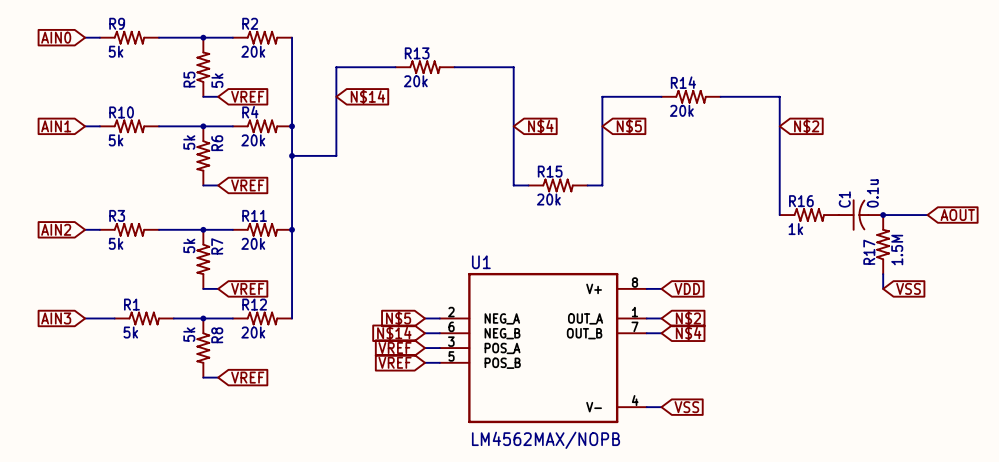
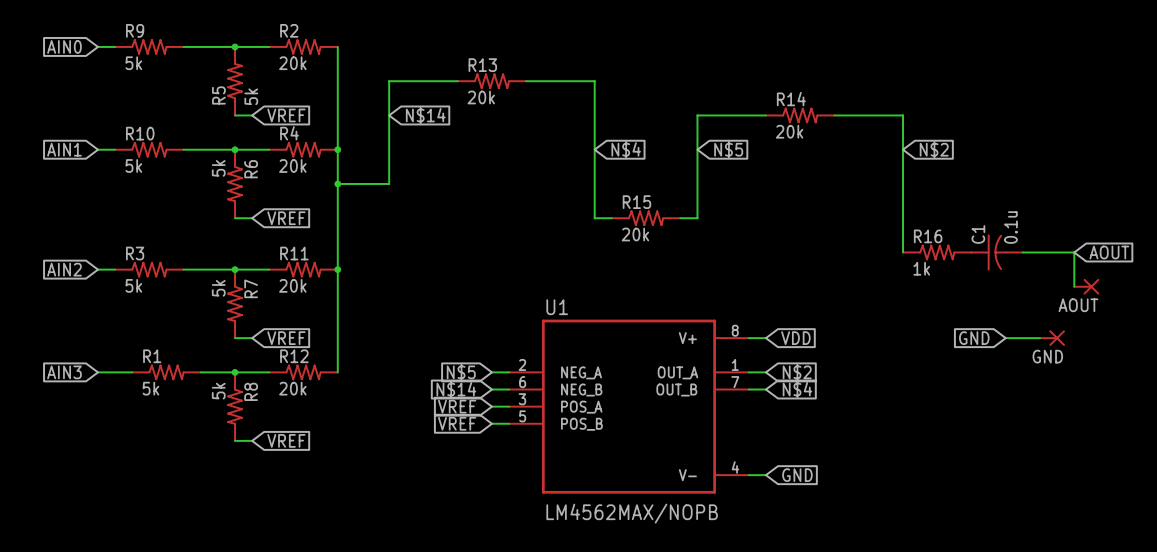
junction: (883, 215) -> none
wire: none -> (1074, 252) (1074, 286)
R17: 1.5M (883, 244) -> none
AOUT: none -> (1086, 286)
wire: (883, 274) (883, 288) -> none
global label: none -> GND (974, 338)
wire: none -> (1005, 338) (1040, 338)
GND: none -> (1052, 338)
global label: VSS (908, 288) -> none
global label: VSS (686, 407) -> GND (797, 475)

